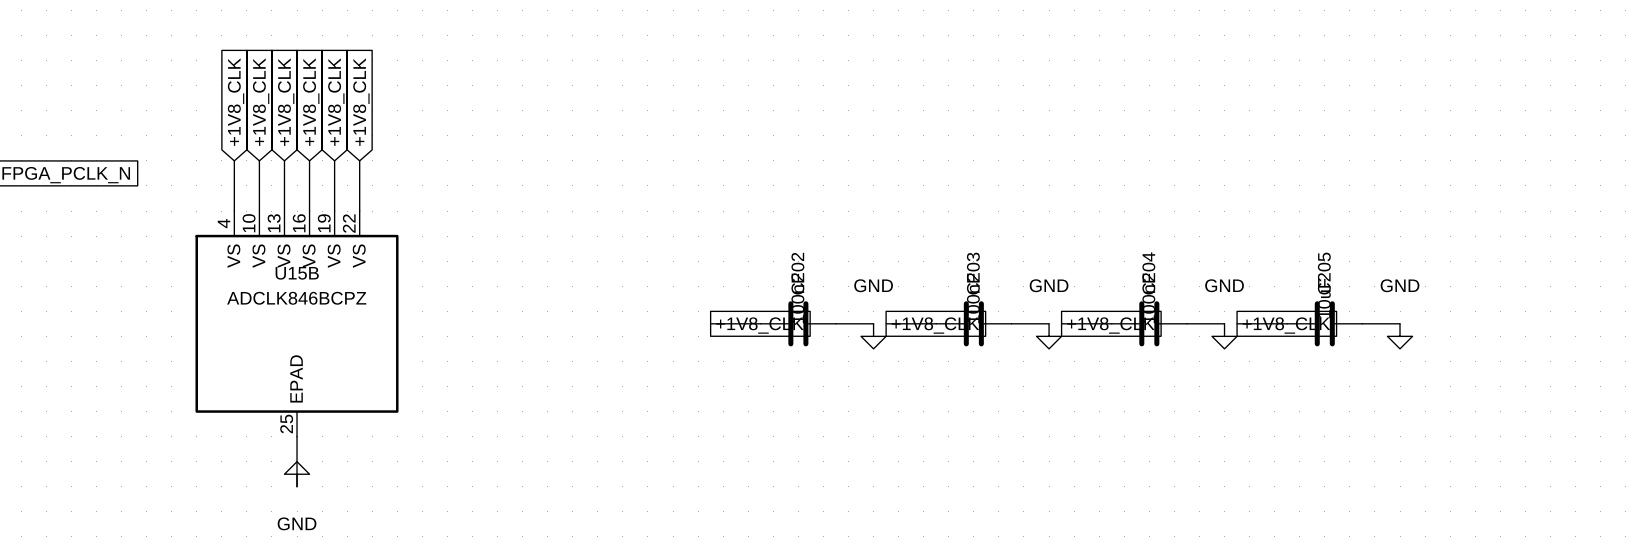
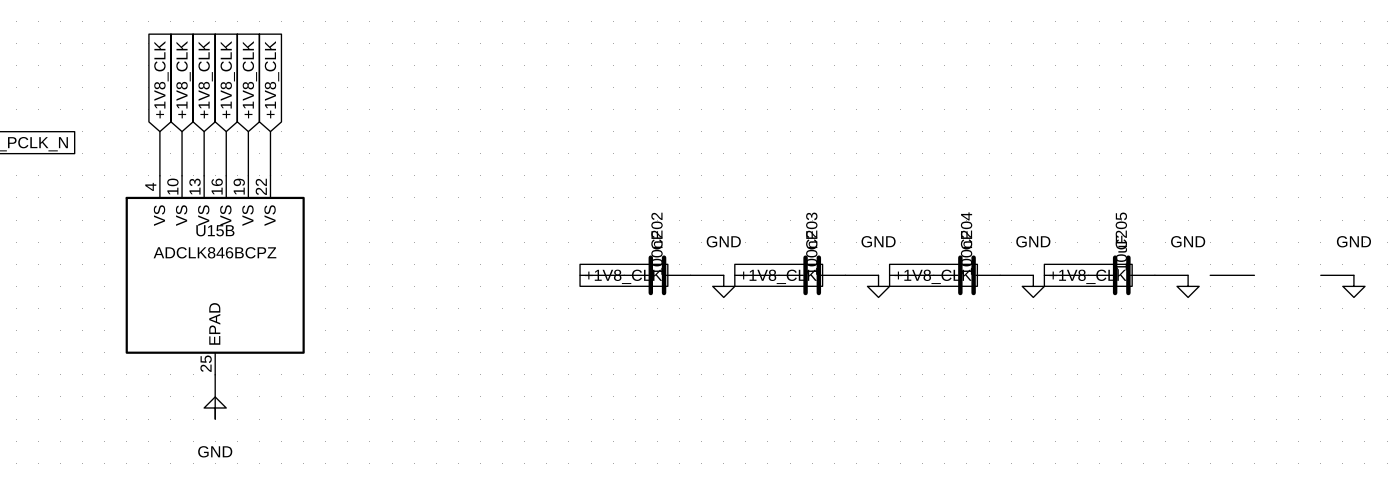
wire: none -> (1210, 275) (1254, 275)
wire: none -> (1320, 275) (1353, 275)
power symbol: none -> GND (1353, 286)

